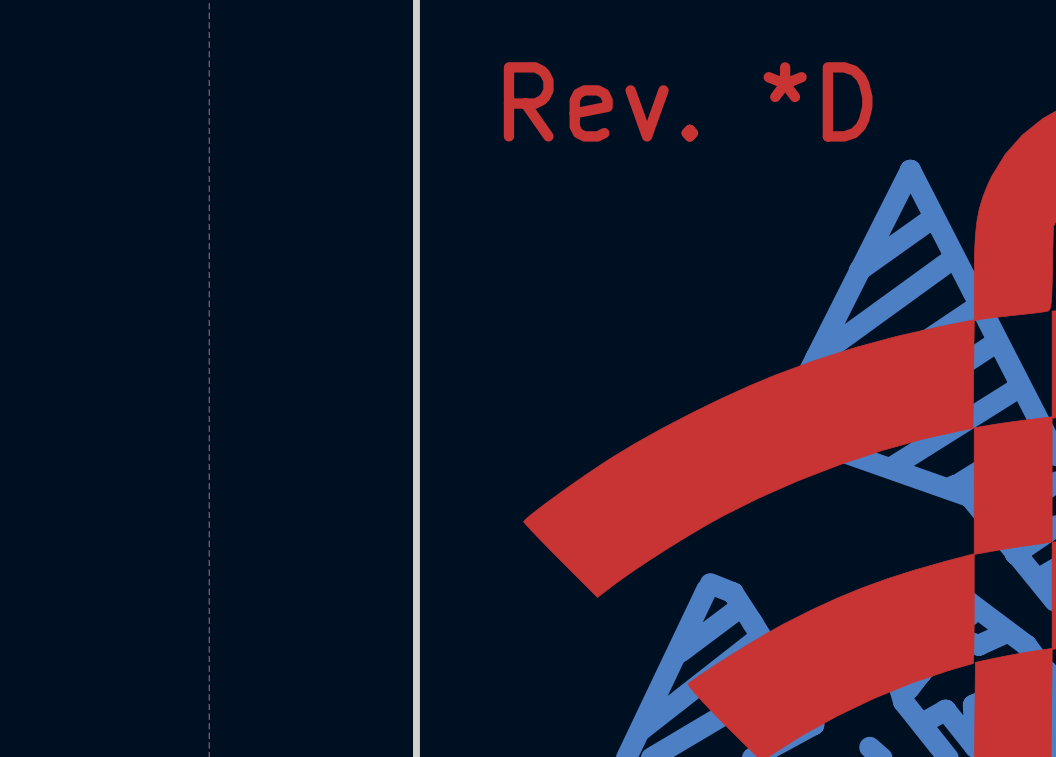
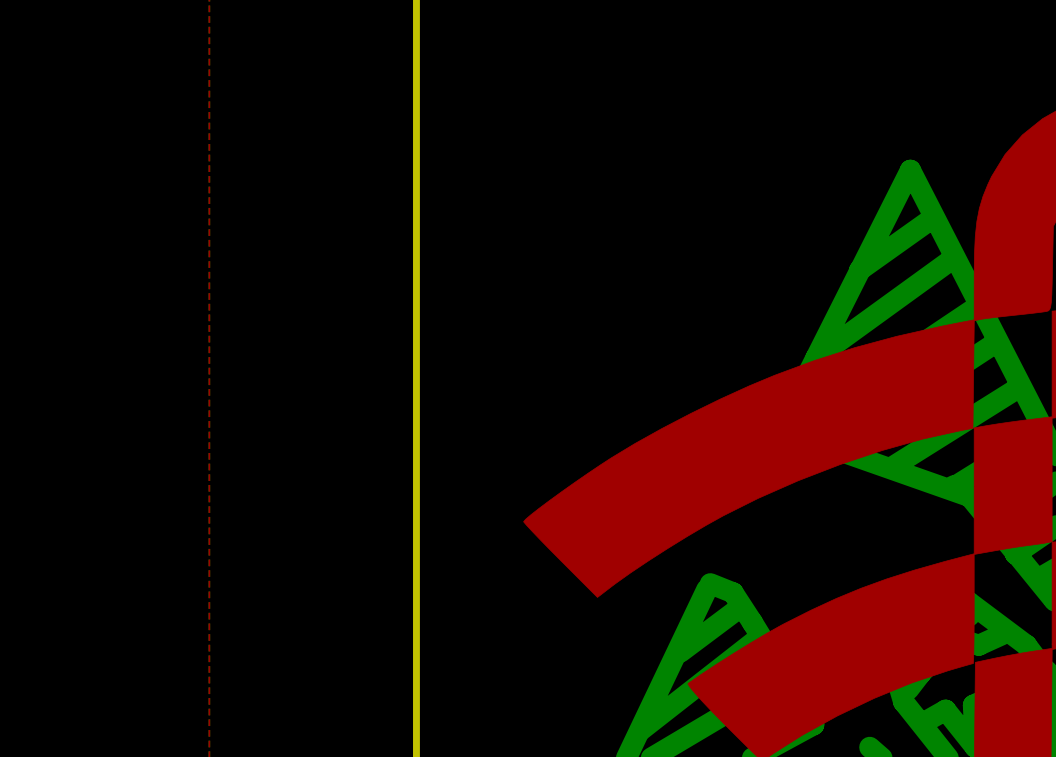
text: Rev. *D (688, 101) -> none

